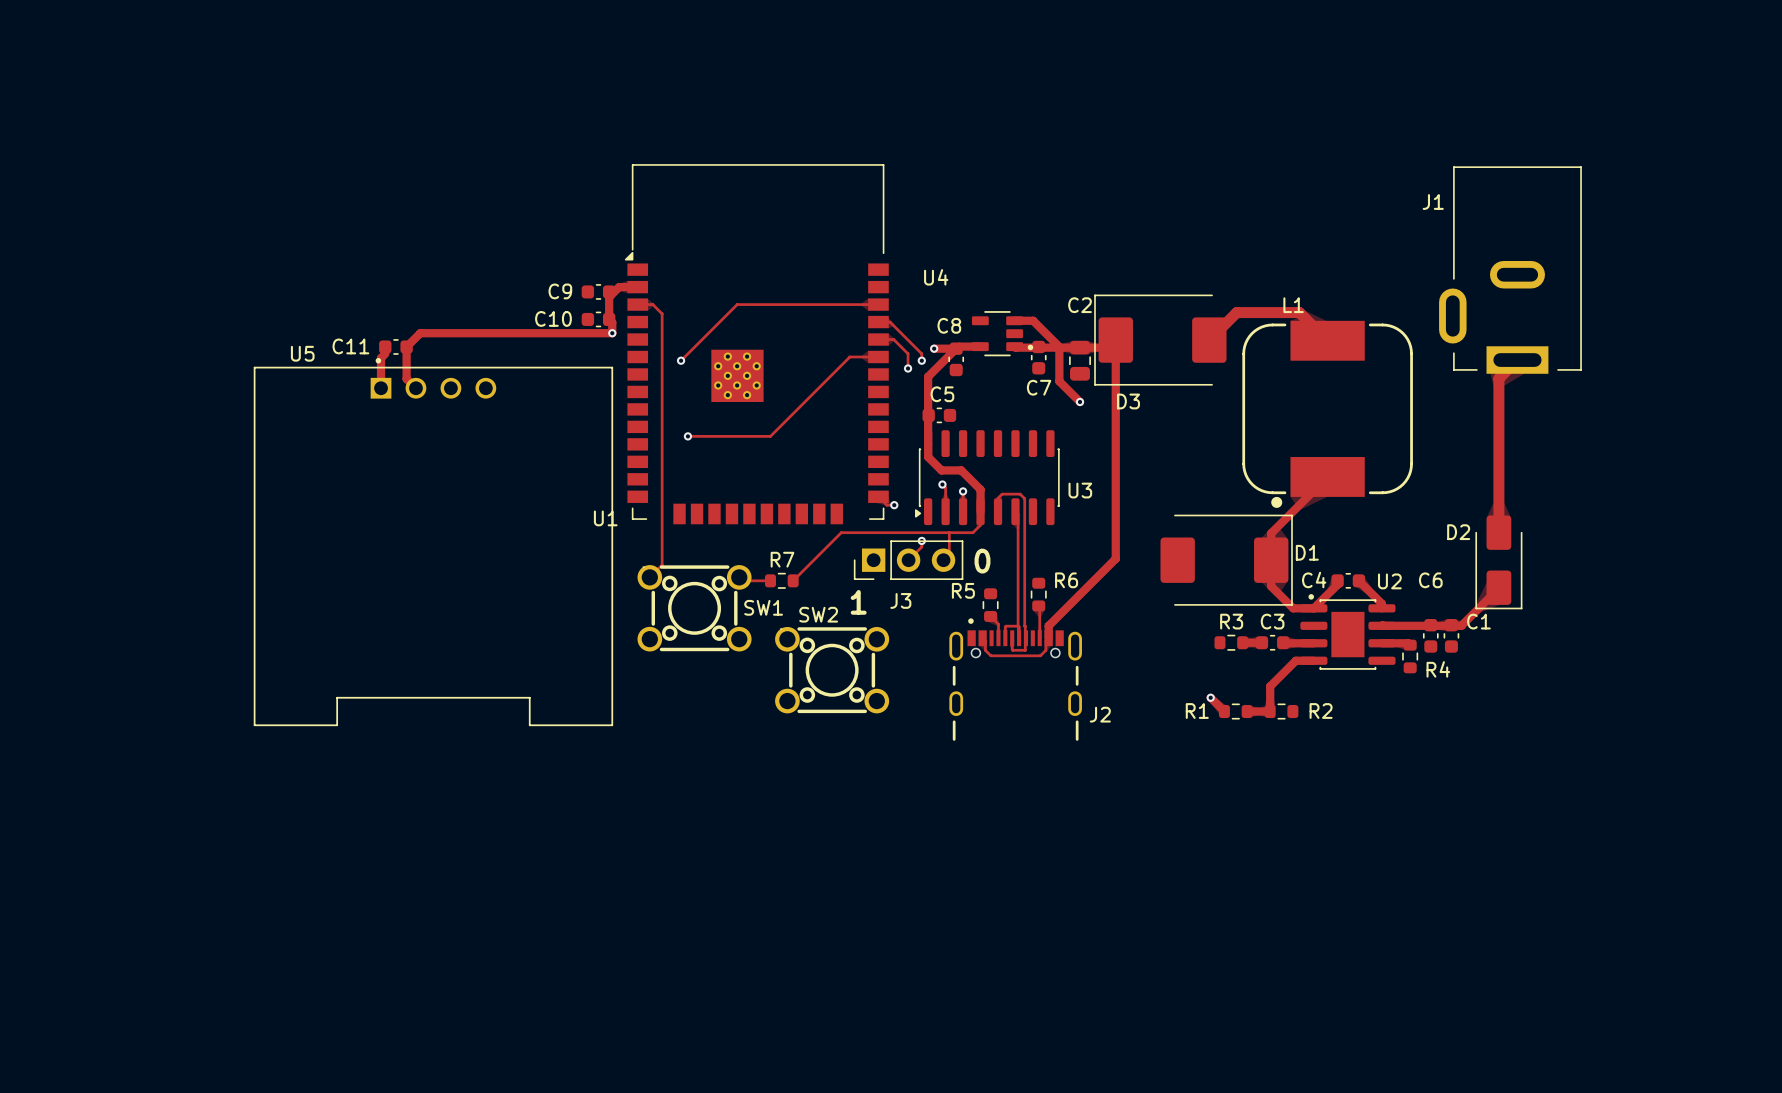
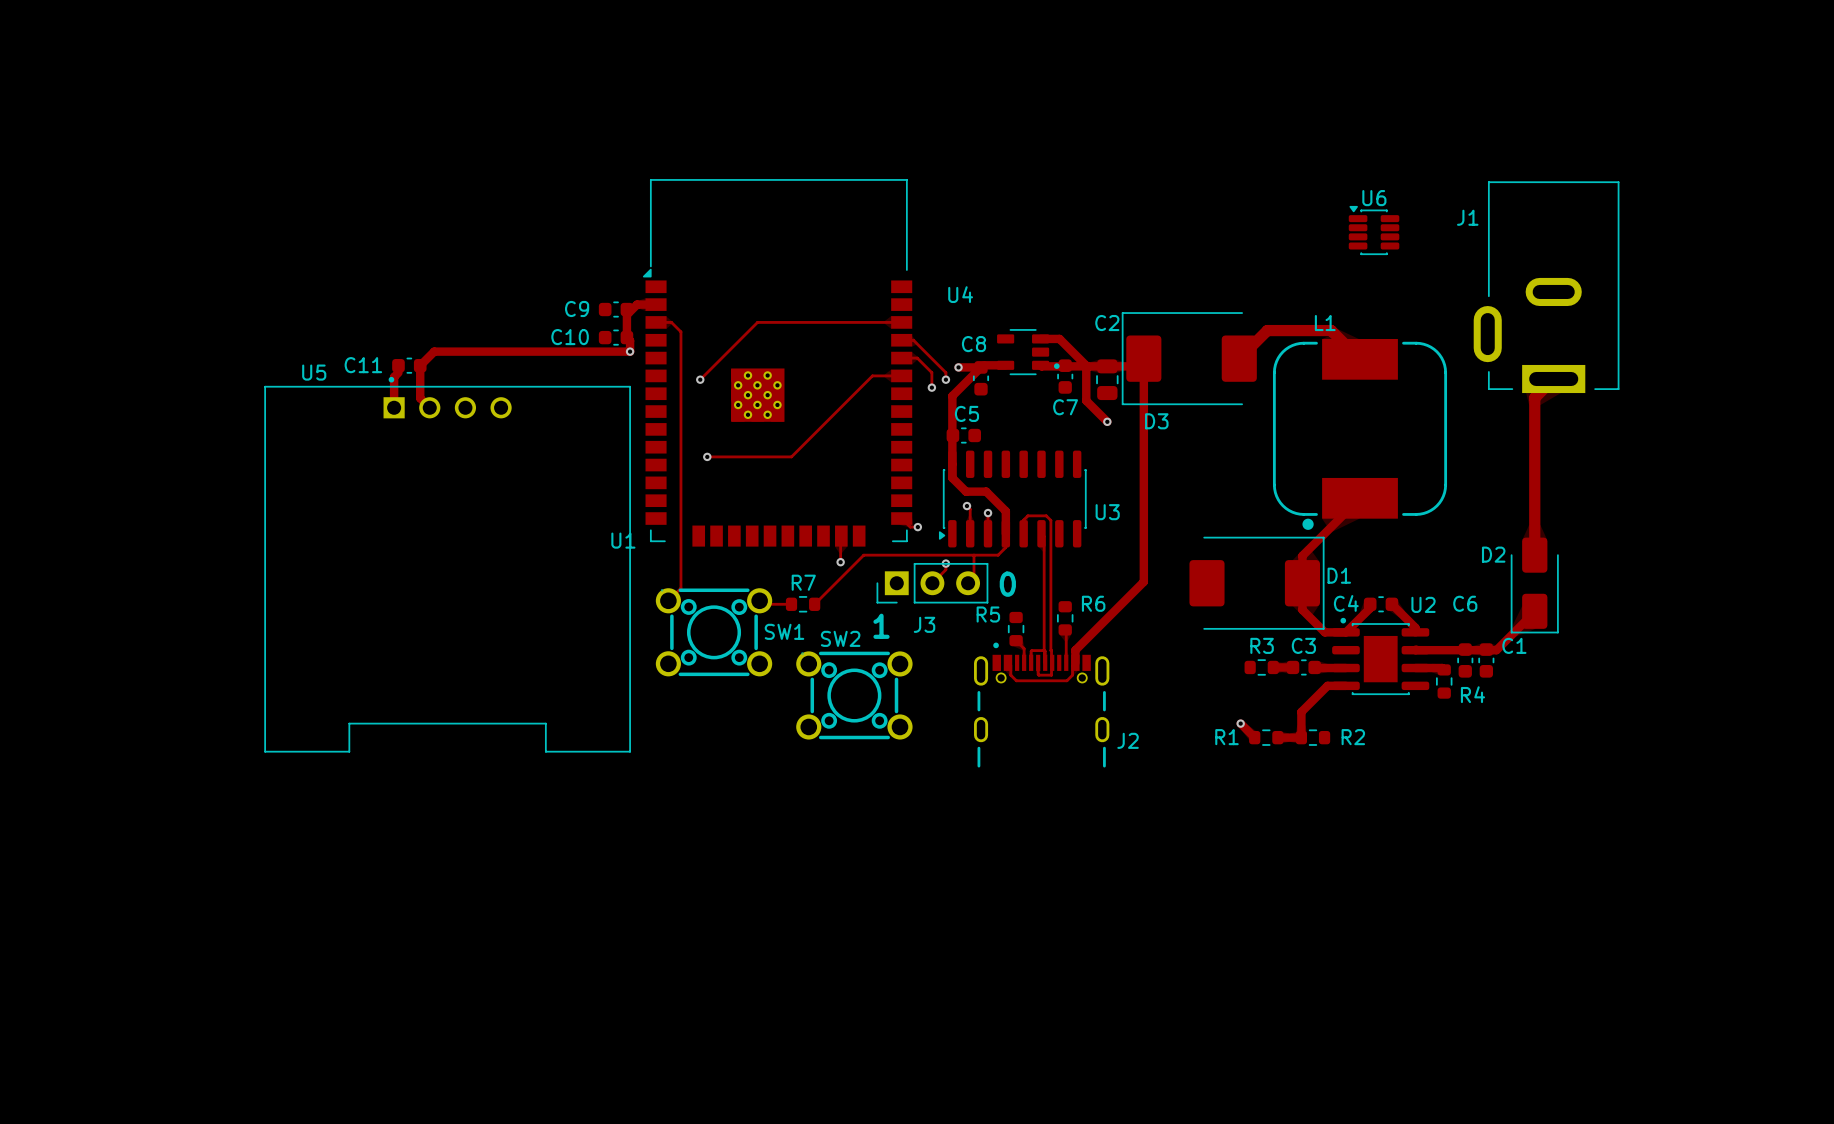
U6: none -> (1374, 230)
track: none -> (841, 536) (840, 562)
via: none -> (840, 562)

